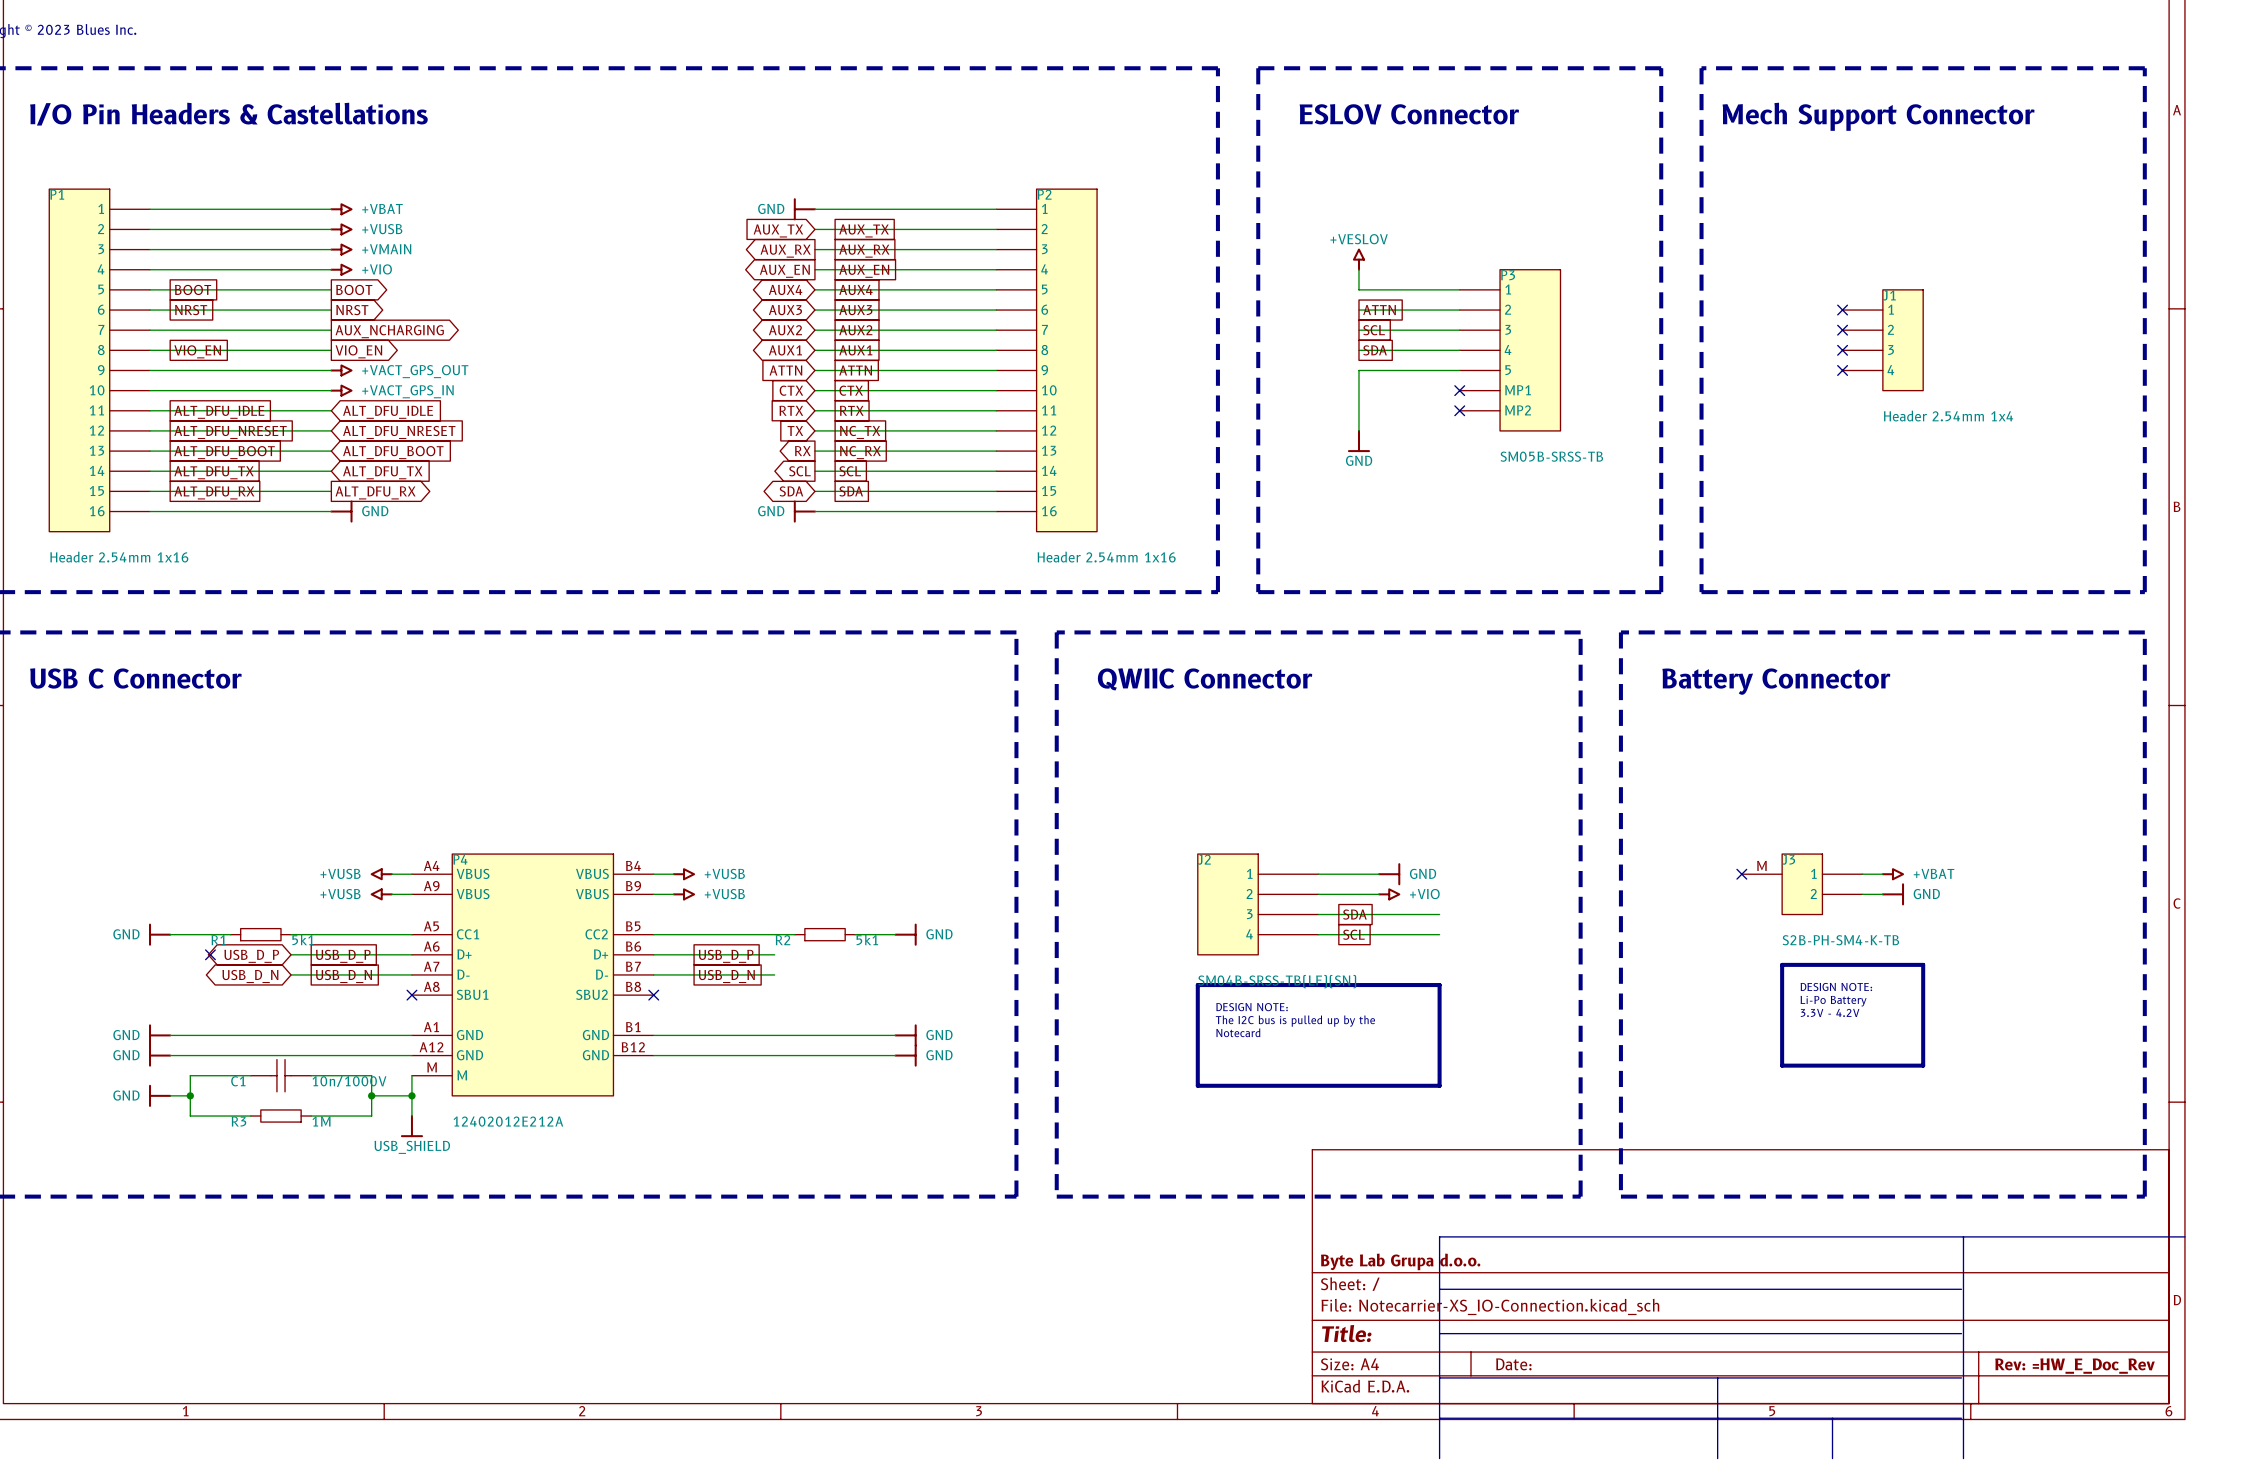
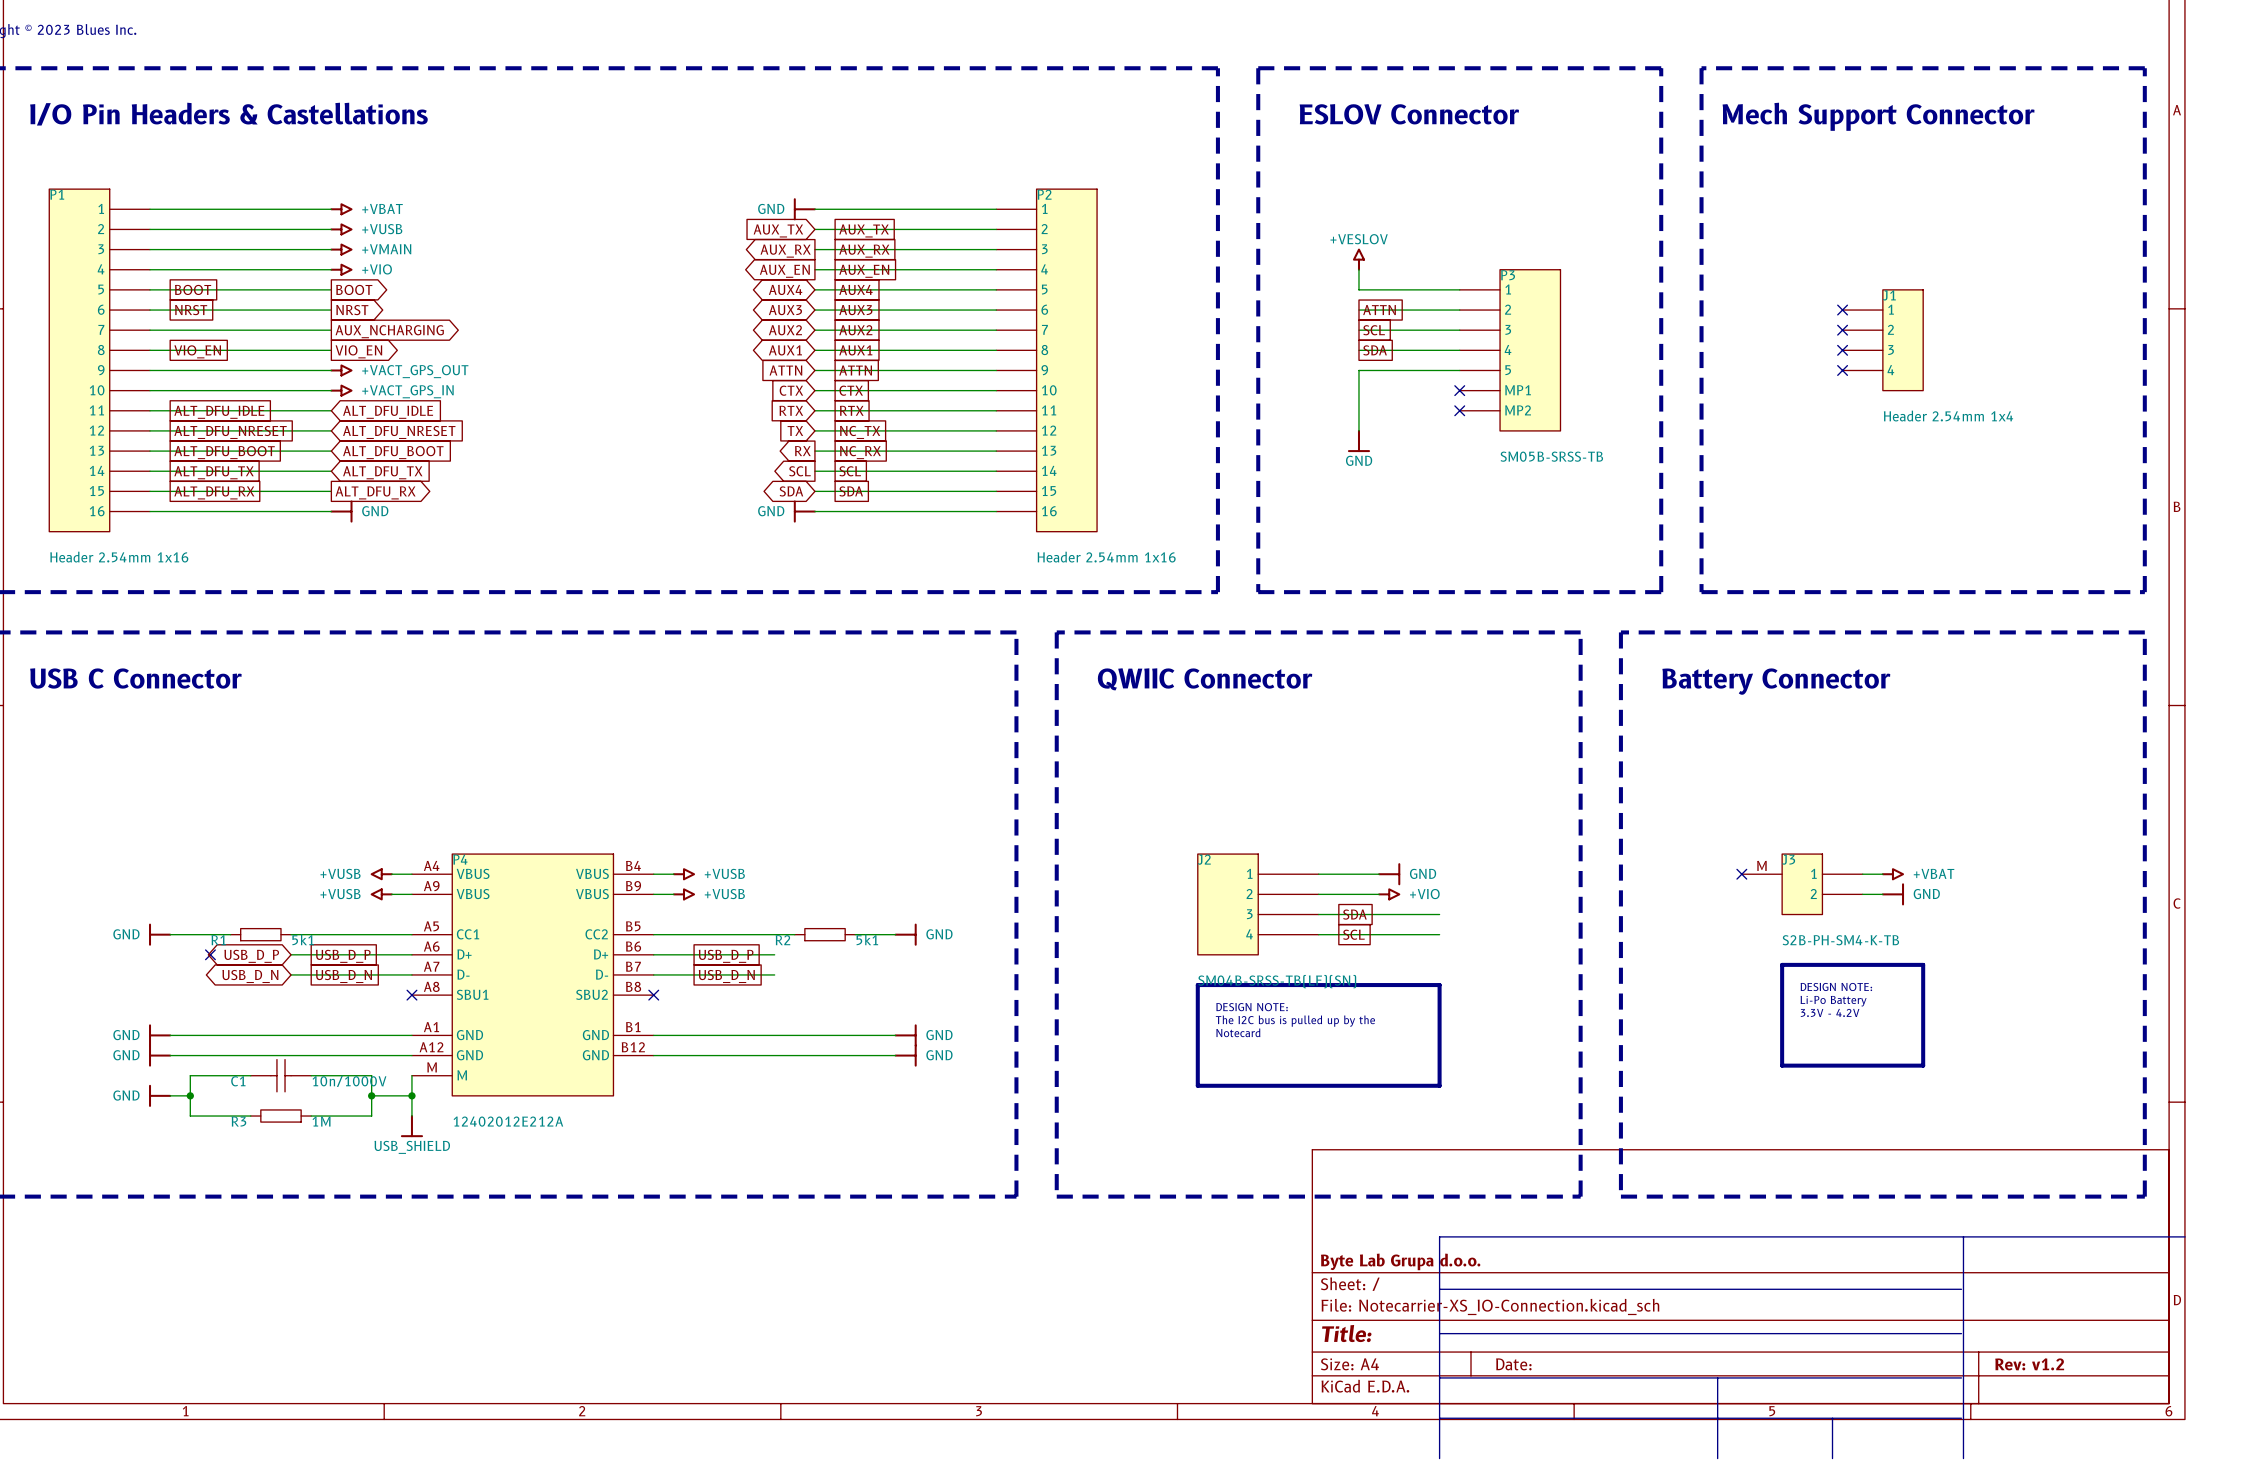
title block: Rev: =HW_E_Doc_Rev (2074, 1366) -> Rev: v1.2 (2029, 1364)

